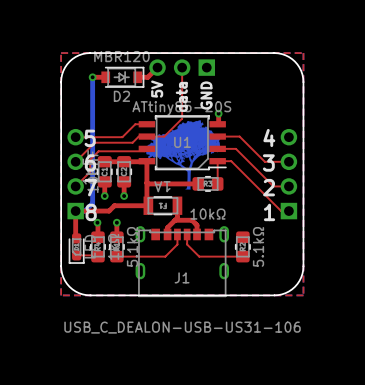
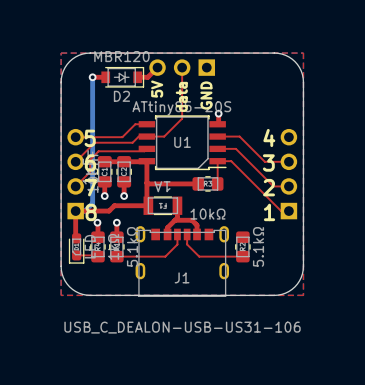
drawing: [143, 120, 221, 190] -> none

